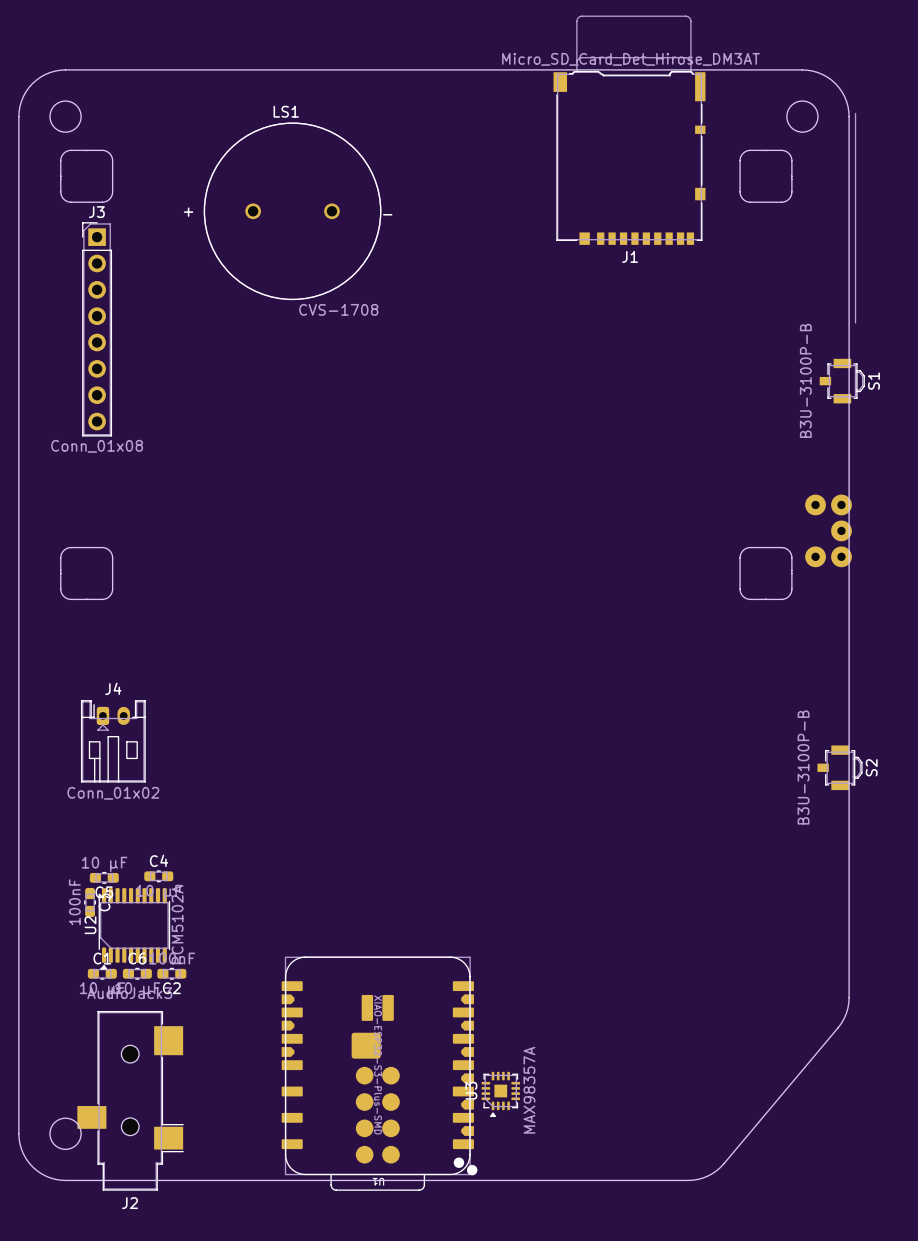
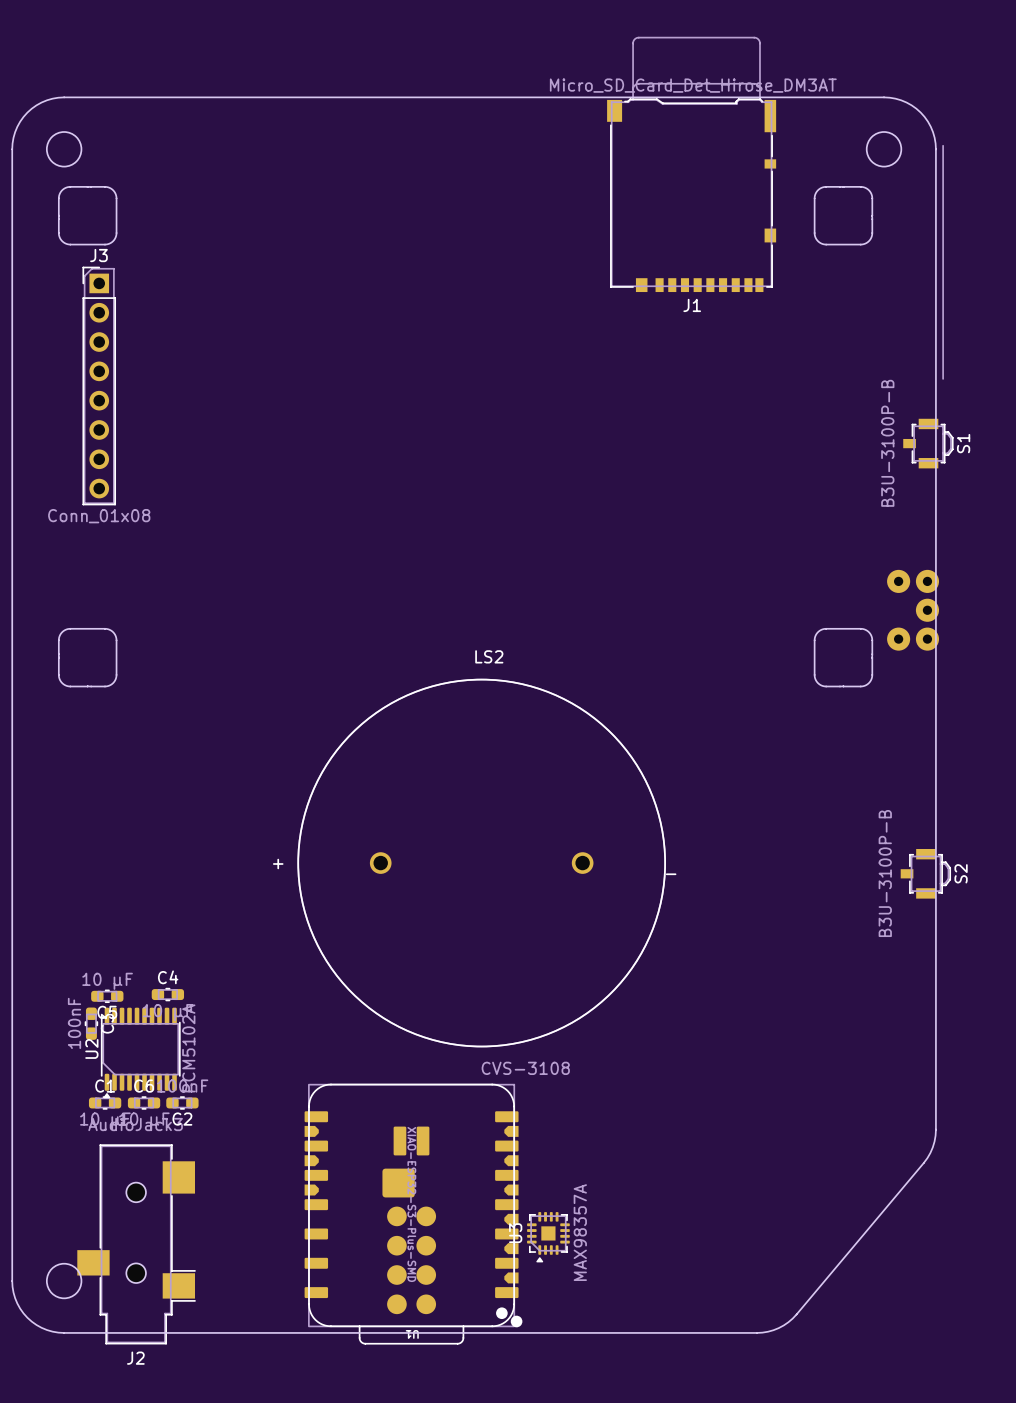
LS1: CVS-1708 (292, 211) -> none
J4: Conn_01x02 (113, 741) -> none
LS2: none -> CVS-3108 (481, 863)

